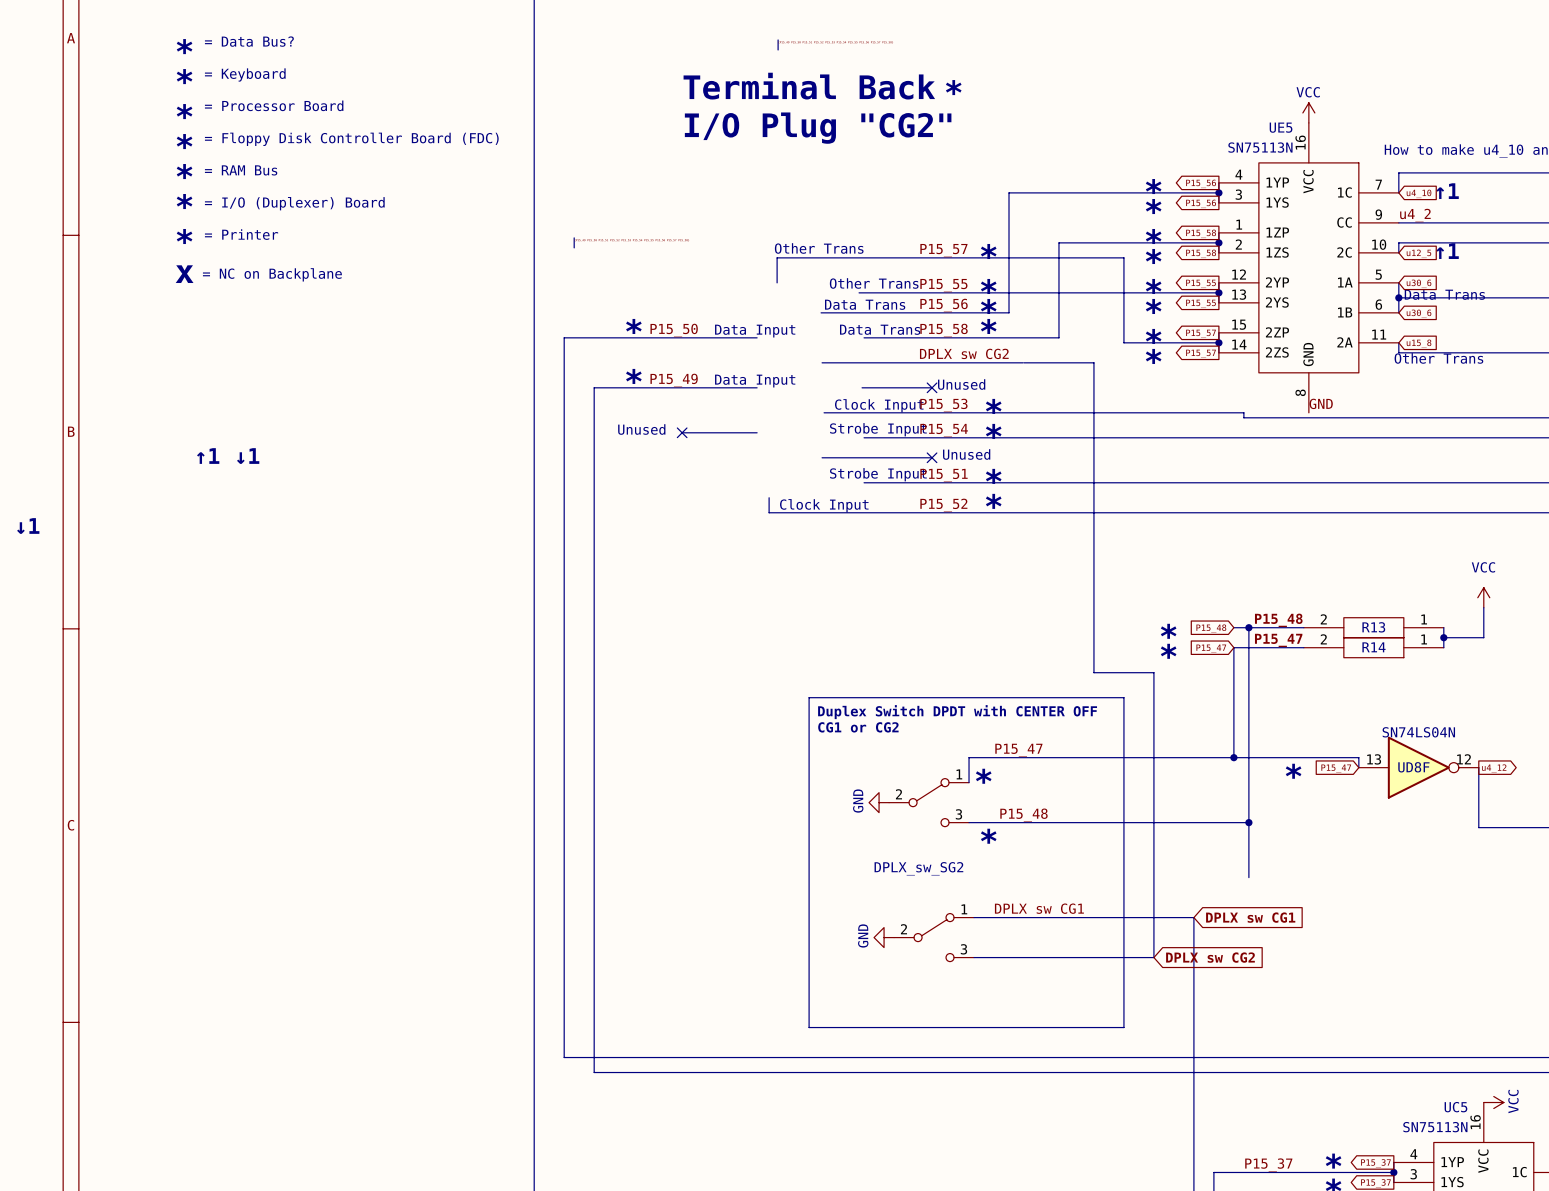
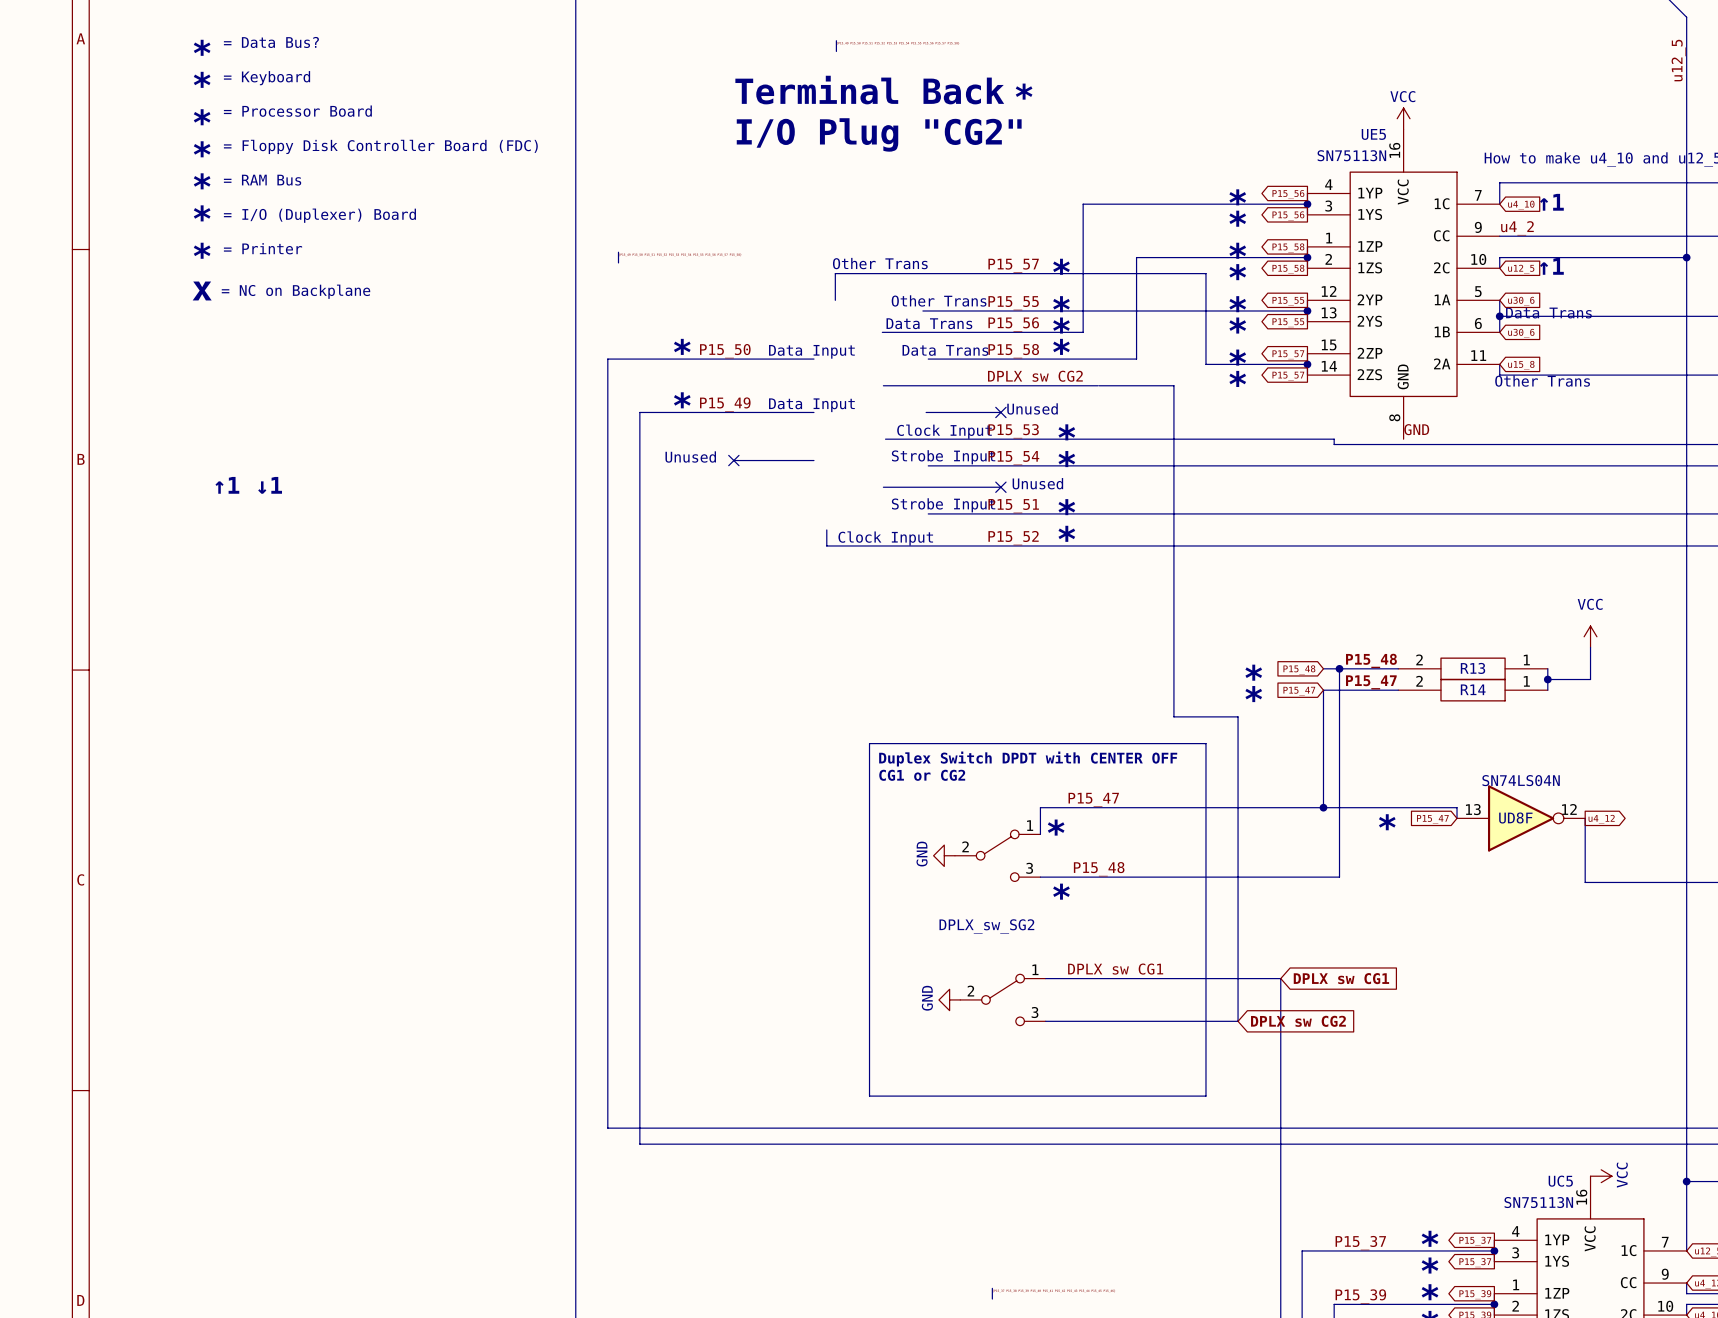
text: ↓1 (28, 525) -> none
wire: (1248, 822) (1248, 877) -> none
junction: (1248, 822) -> none

